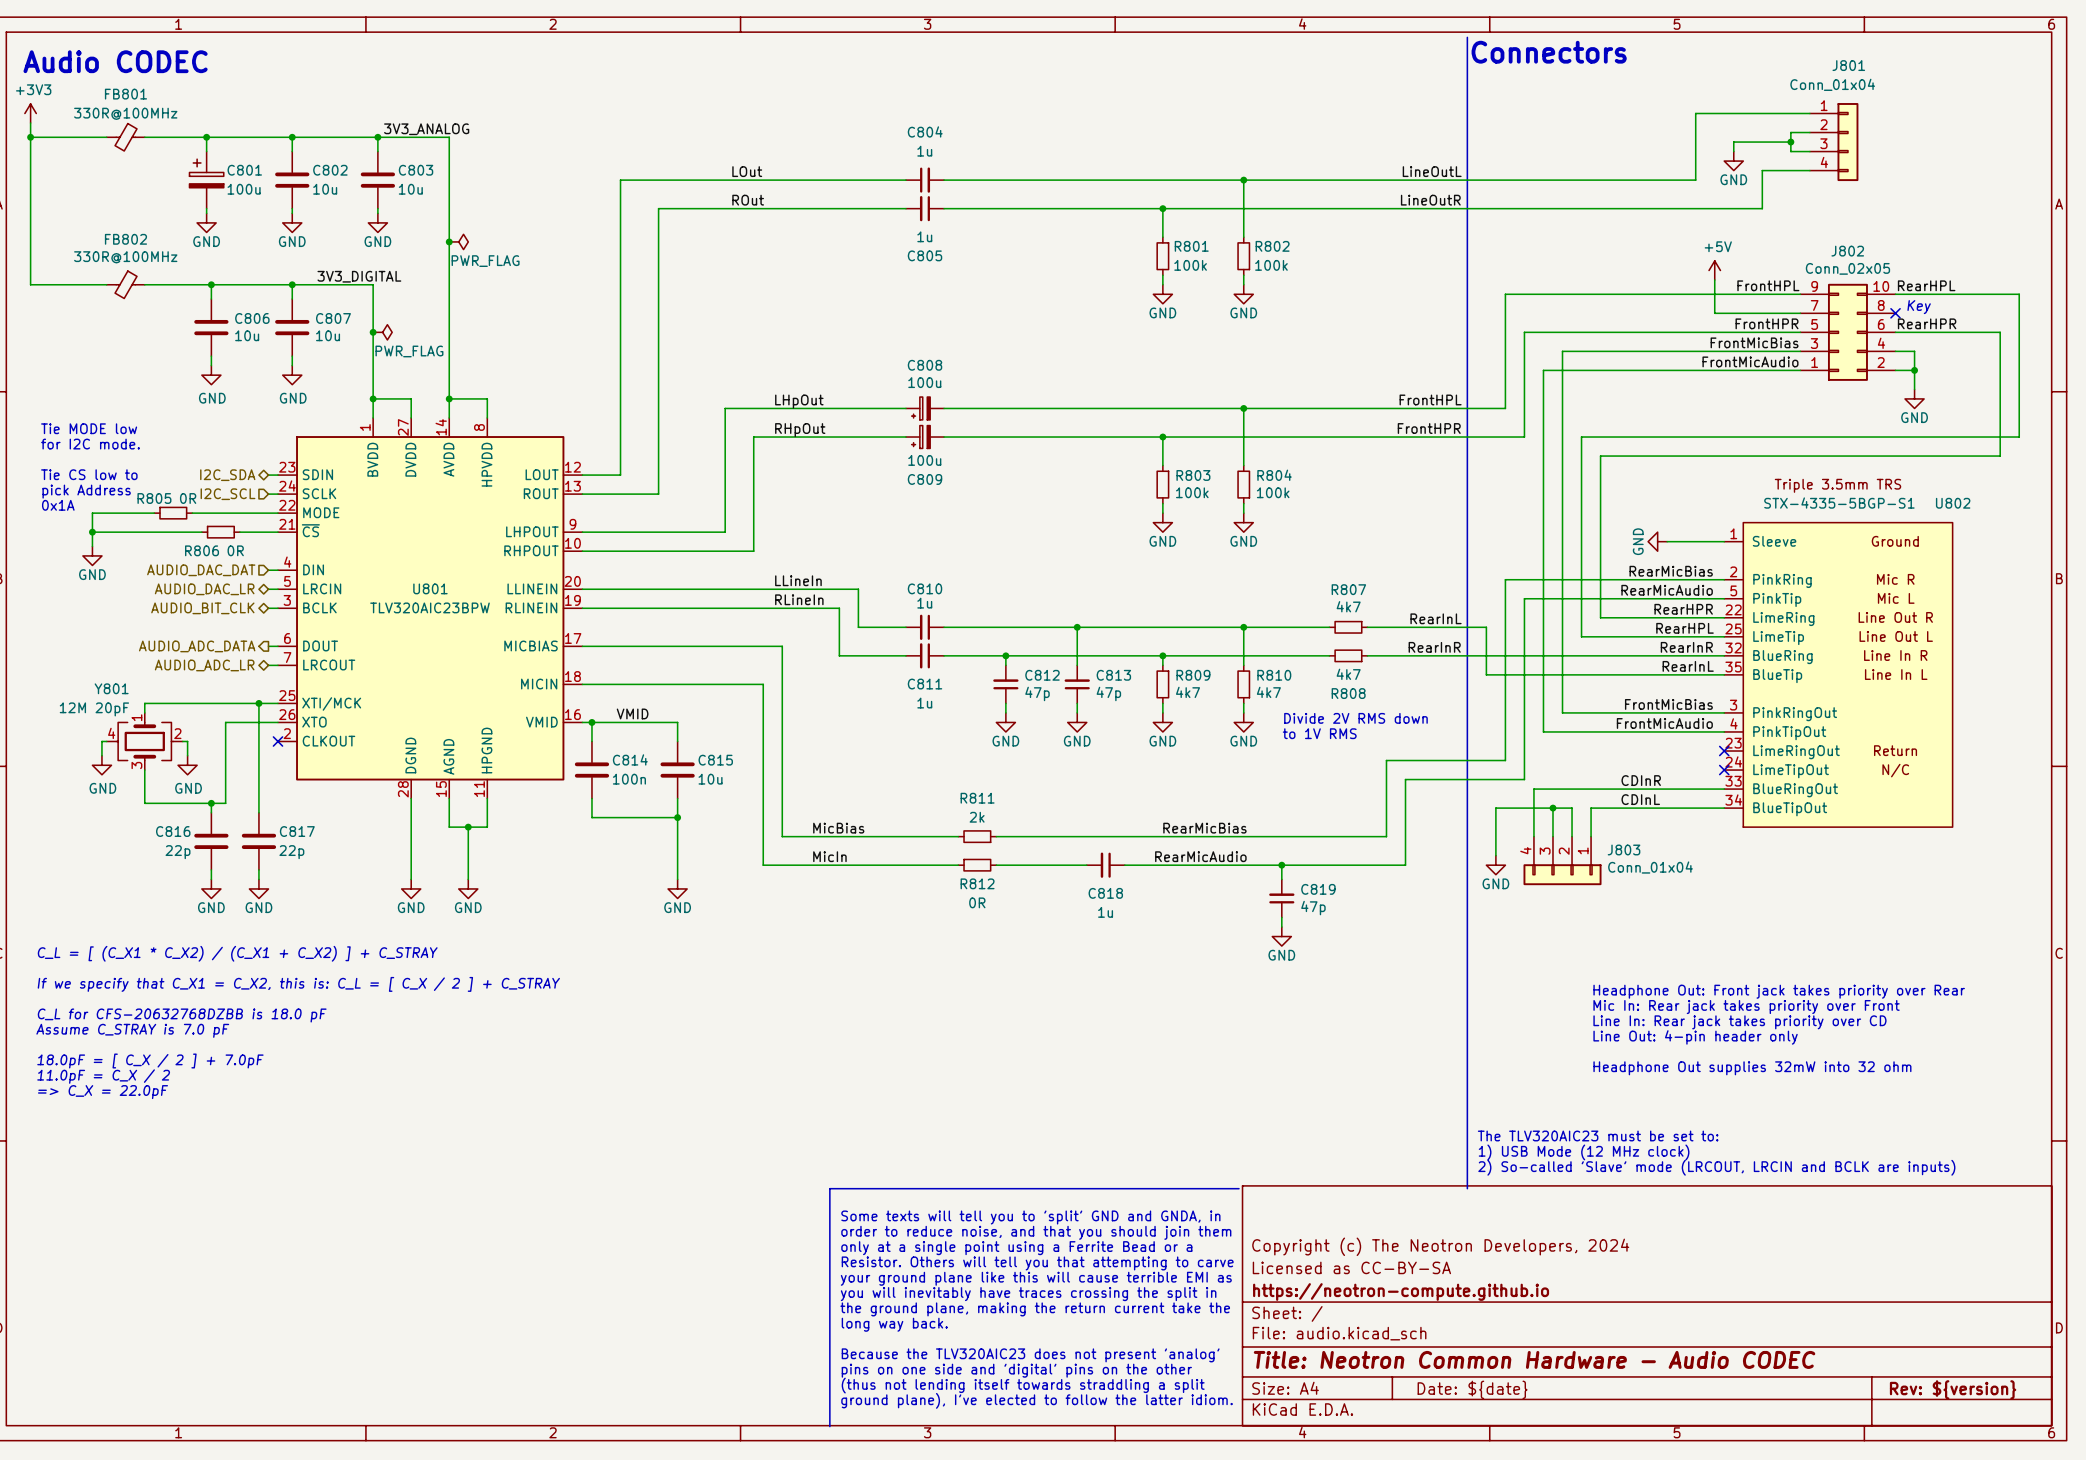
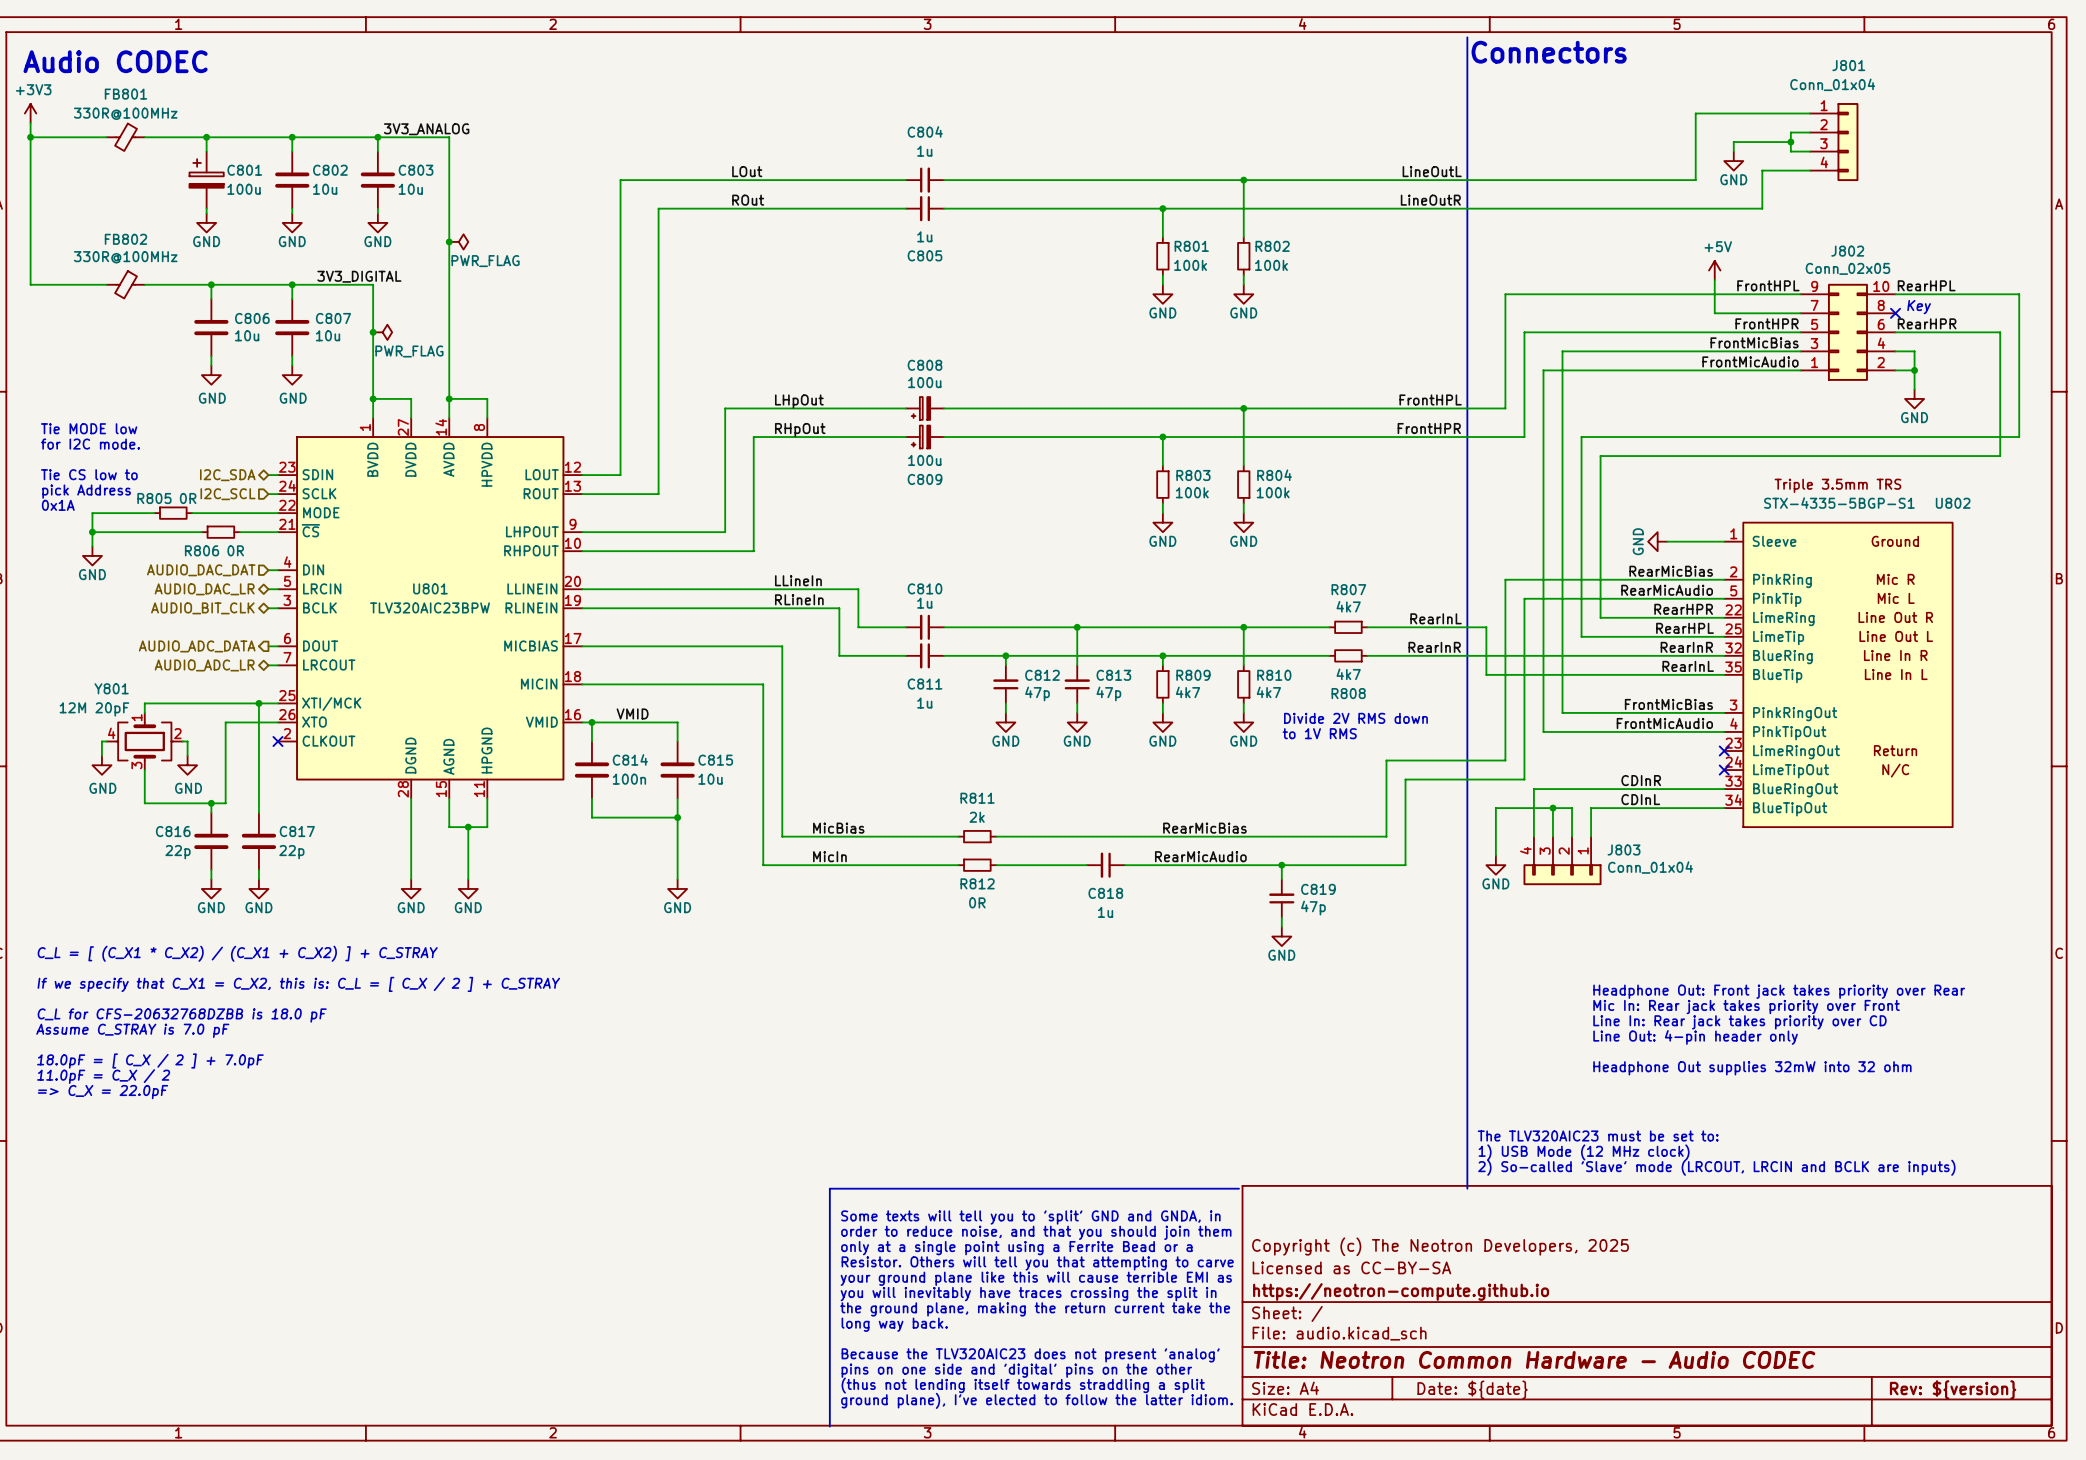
title block: Copyright (c) The Neotron Developers, 2024 (1440, 1246) -> Copyright (c) The Neotron Developers, 2025 (1440, 1246)

